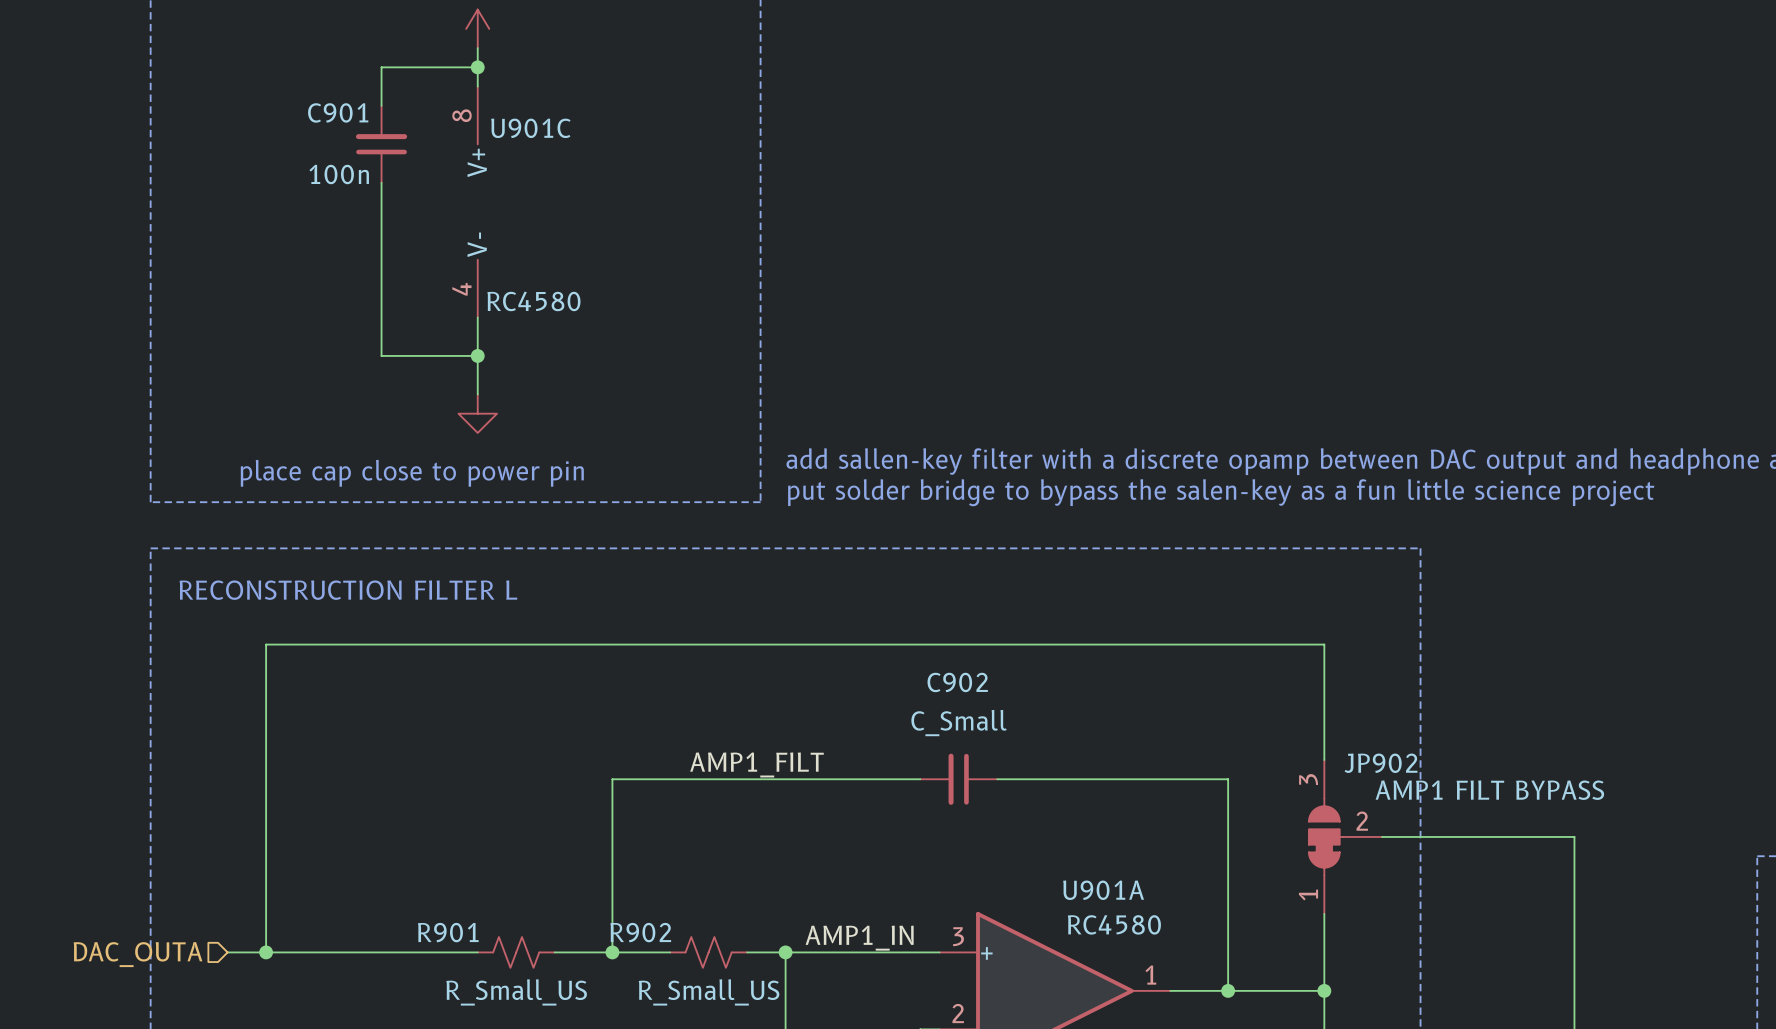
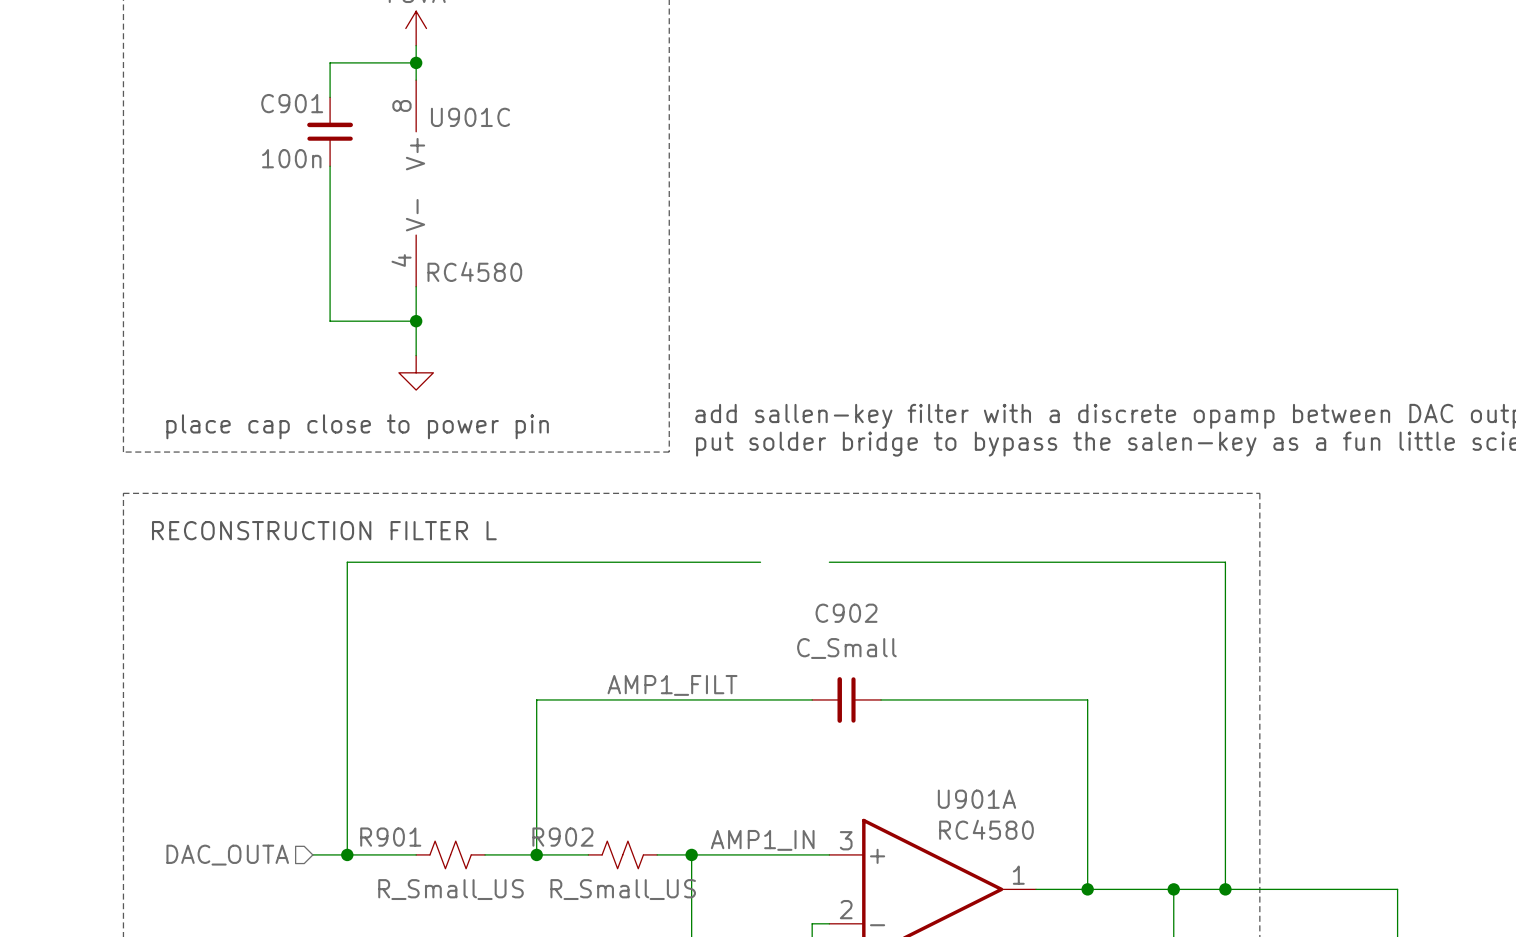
wire: none -> (760, 562) (347, 562) (347, 854)
wire: none -> (829, 562) (1225, 562) (1225, 889)
wire: (1324, 760) (1324, 644) (266, 644) (266, 952) -> none
JP902: AMP1 FILT BYPASS (1345, 836) -> none
wire: (1382, 836) (1574, 836) (1574, 990) -> (1173, 889) (1397, 889)
wire: (1324, 913) (1324, 990) -> none
wire: (227, 952) (362, 952) -> none
junction: (266, 952) -> none
junction: none -> (347, 854)
hierarchical label position: DAC_OUTA (138, 954) -> DAC_OUTA (227, 855)
junction: none -> (1225, 889)

